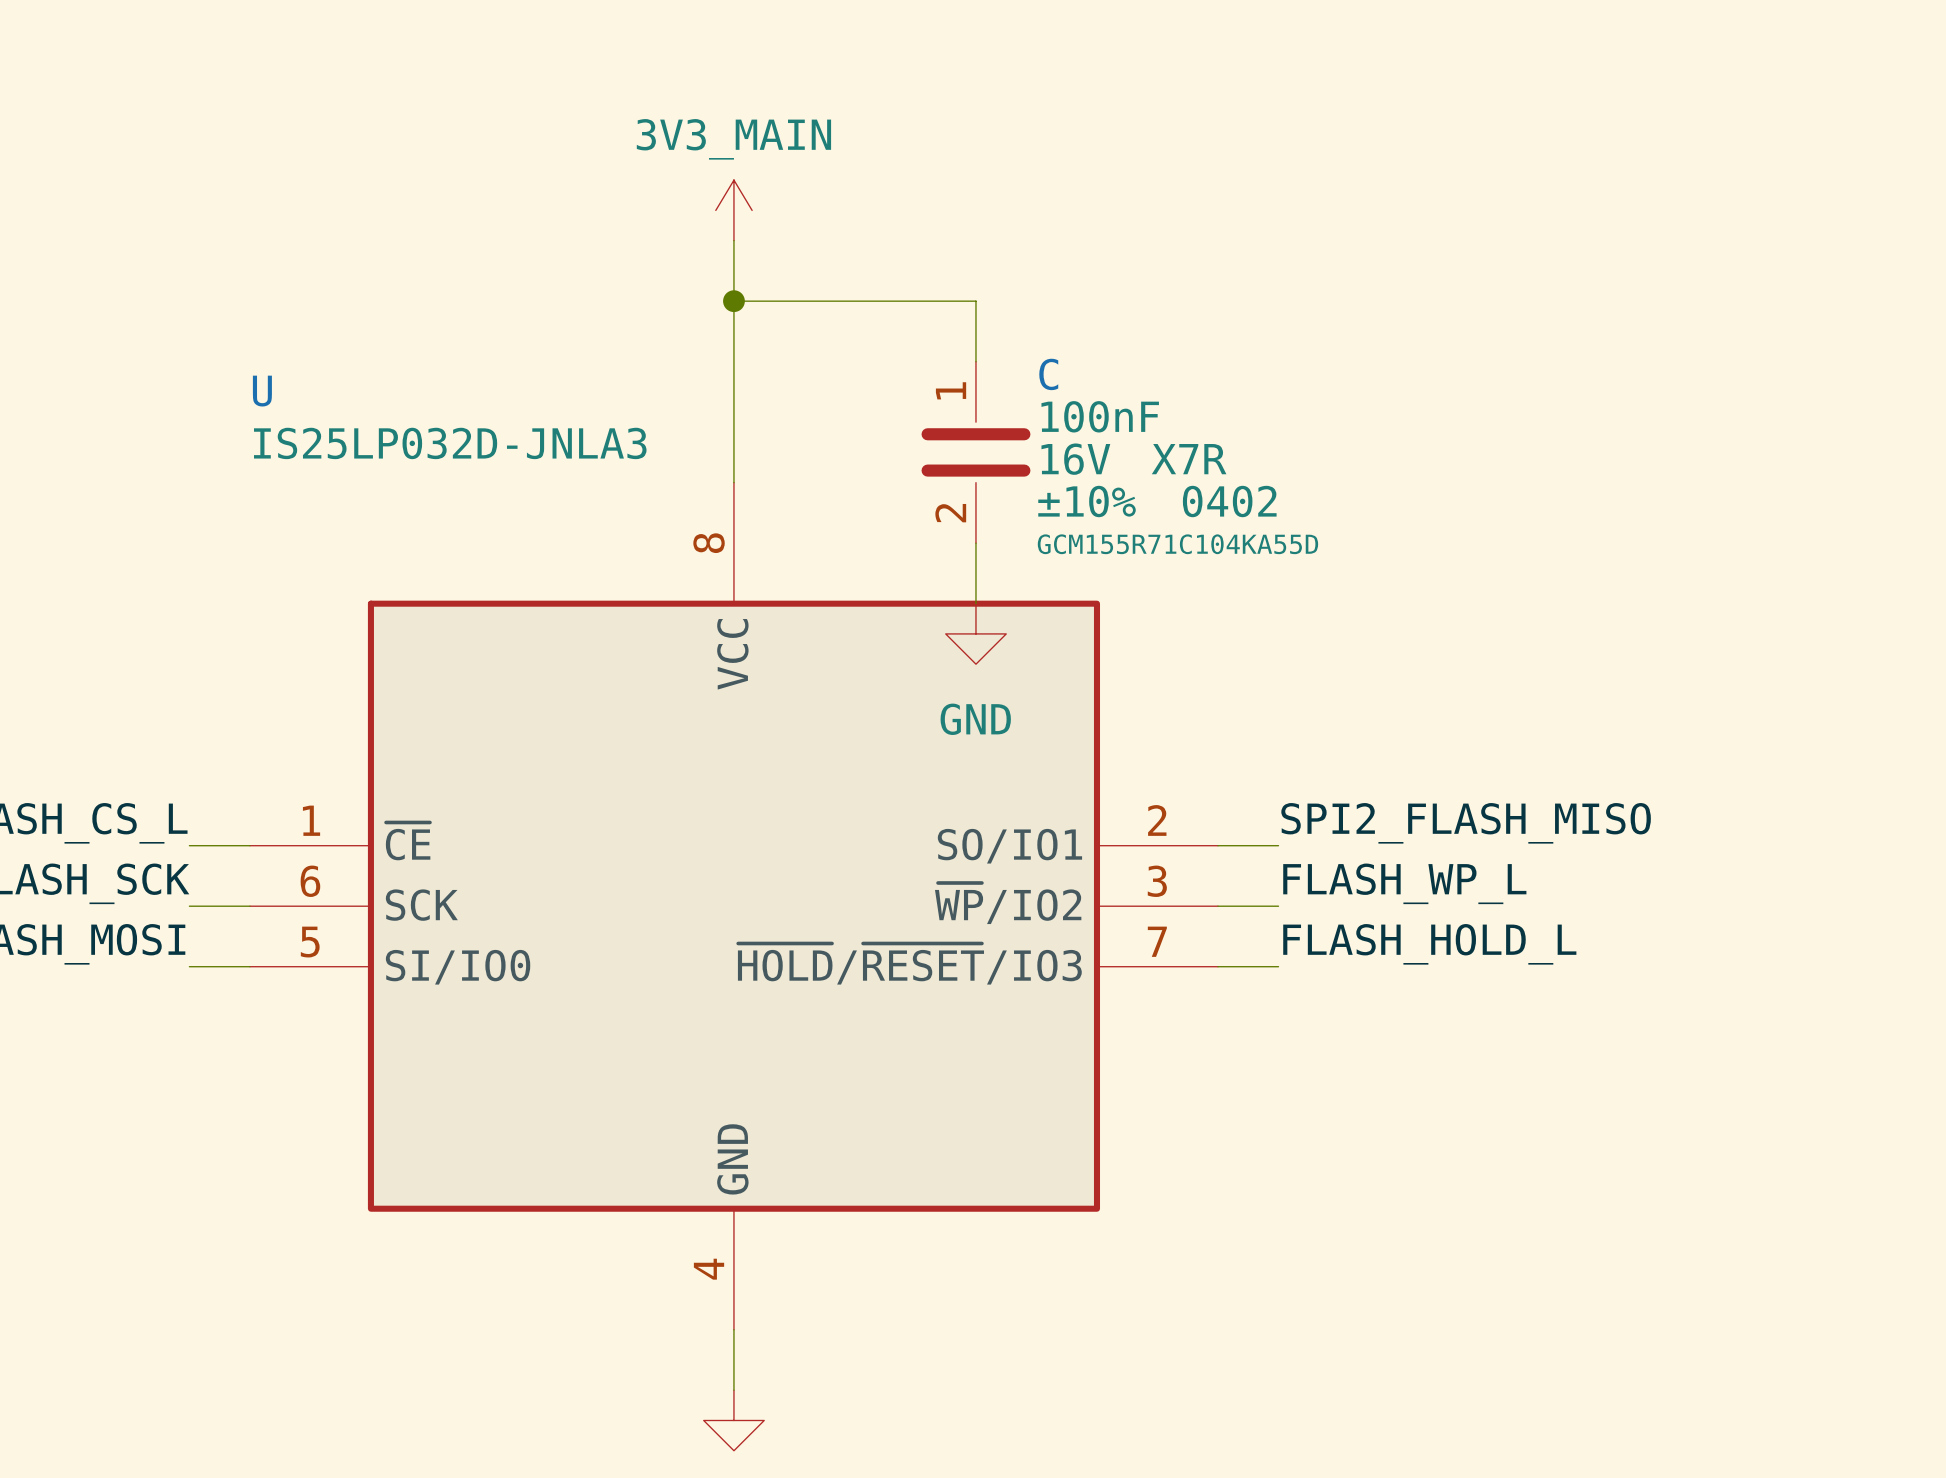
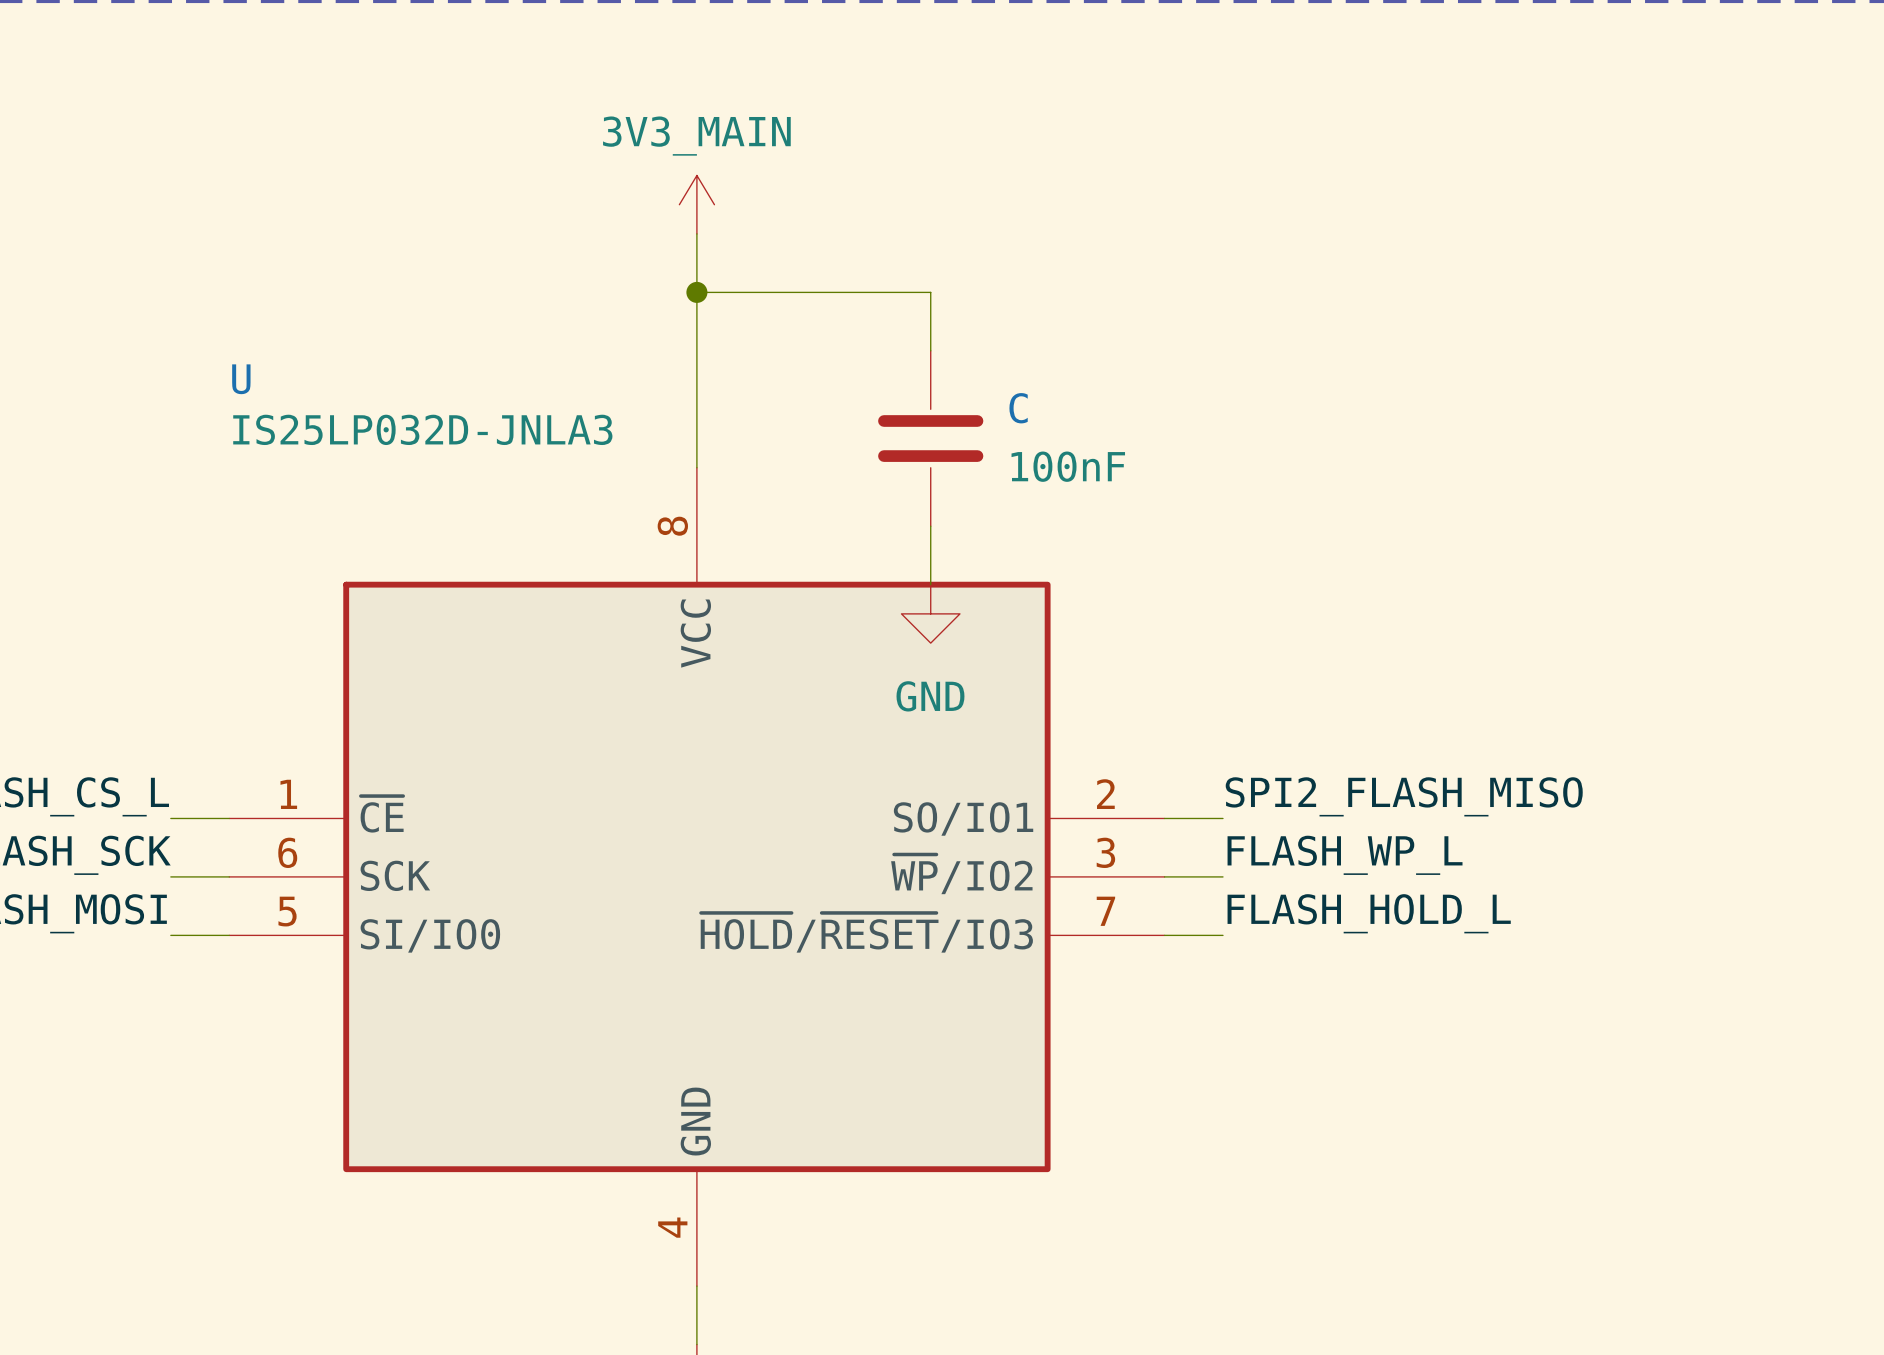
C name position: C (1048, 374) -> C (1018, 408)
C pin number: 1 (951, 390) -> none
C value position: 100nF (1100, 416) -> 100nF (1068, 466)
C text: 16V (1075, 459) -> none
C text: X7R (1189, 459) -> none
C text: ±10% (1087, 501) -> none
C text: 0402 (1229, 501) -> none
C pin number: 2 (950, 513) -> none
C text: GCM155R71C104KA55D (1177, 544) -> none

